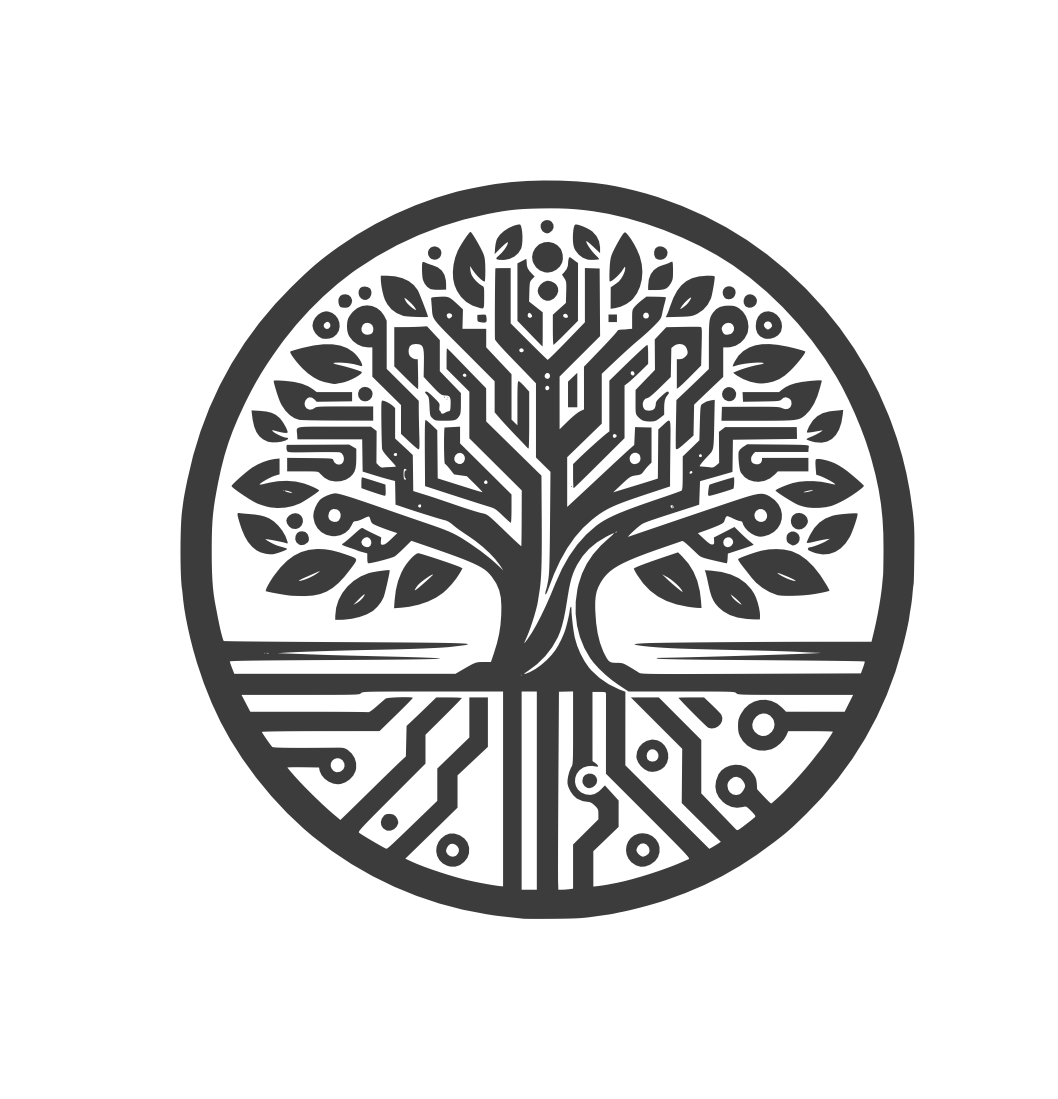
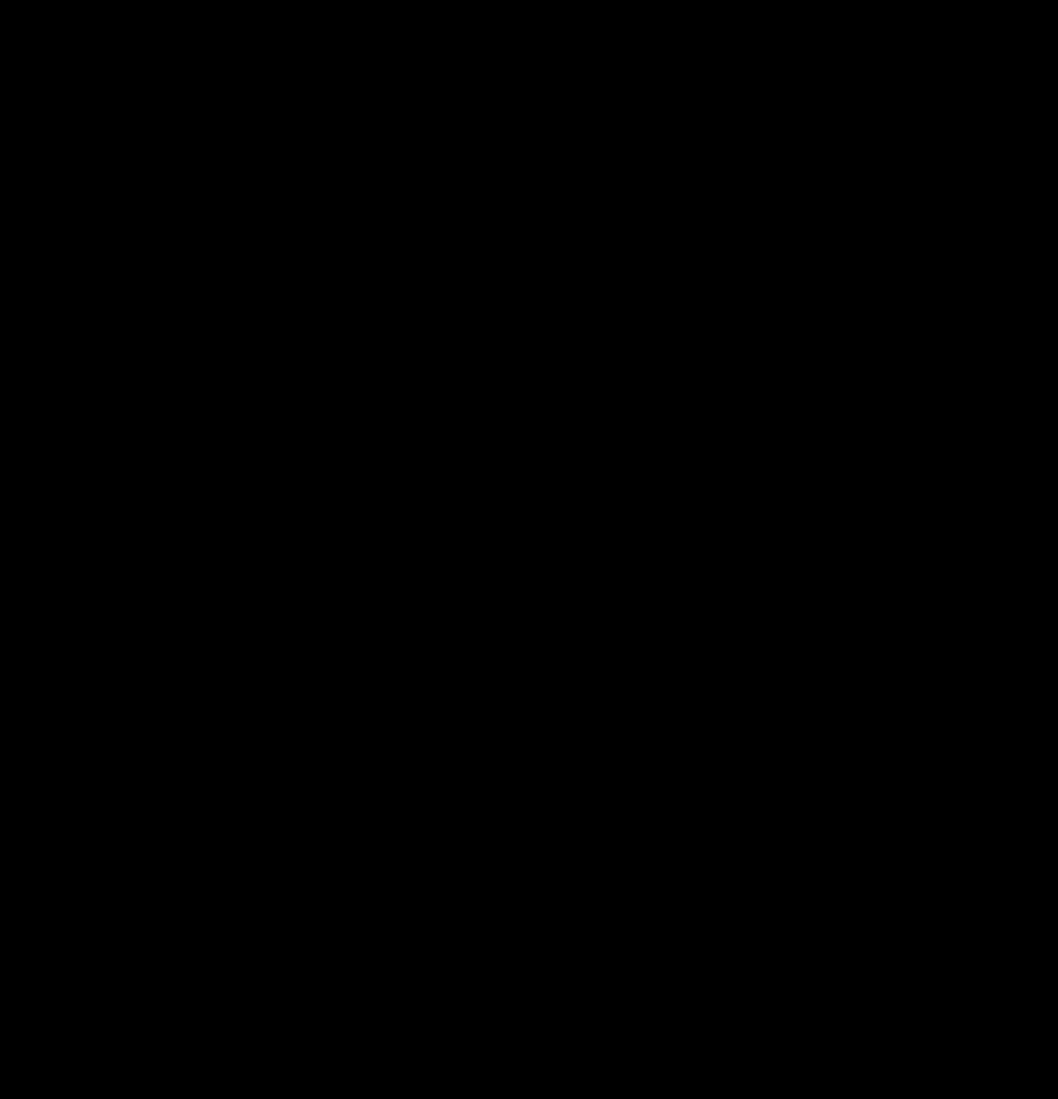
drawing: [180, 180, 915, 919] -> none

